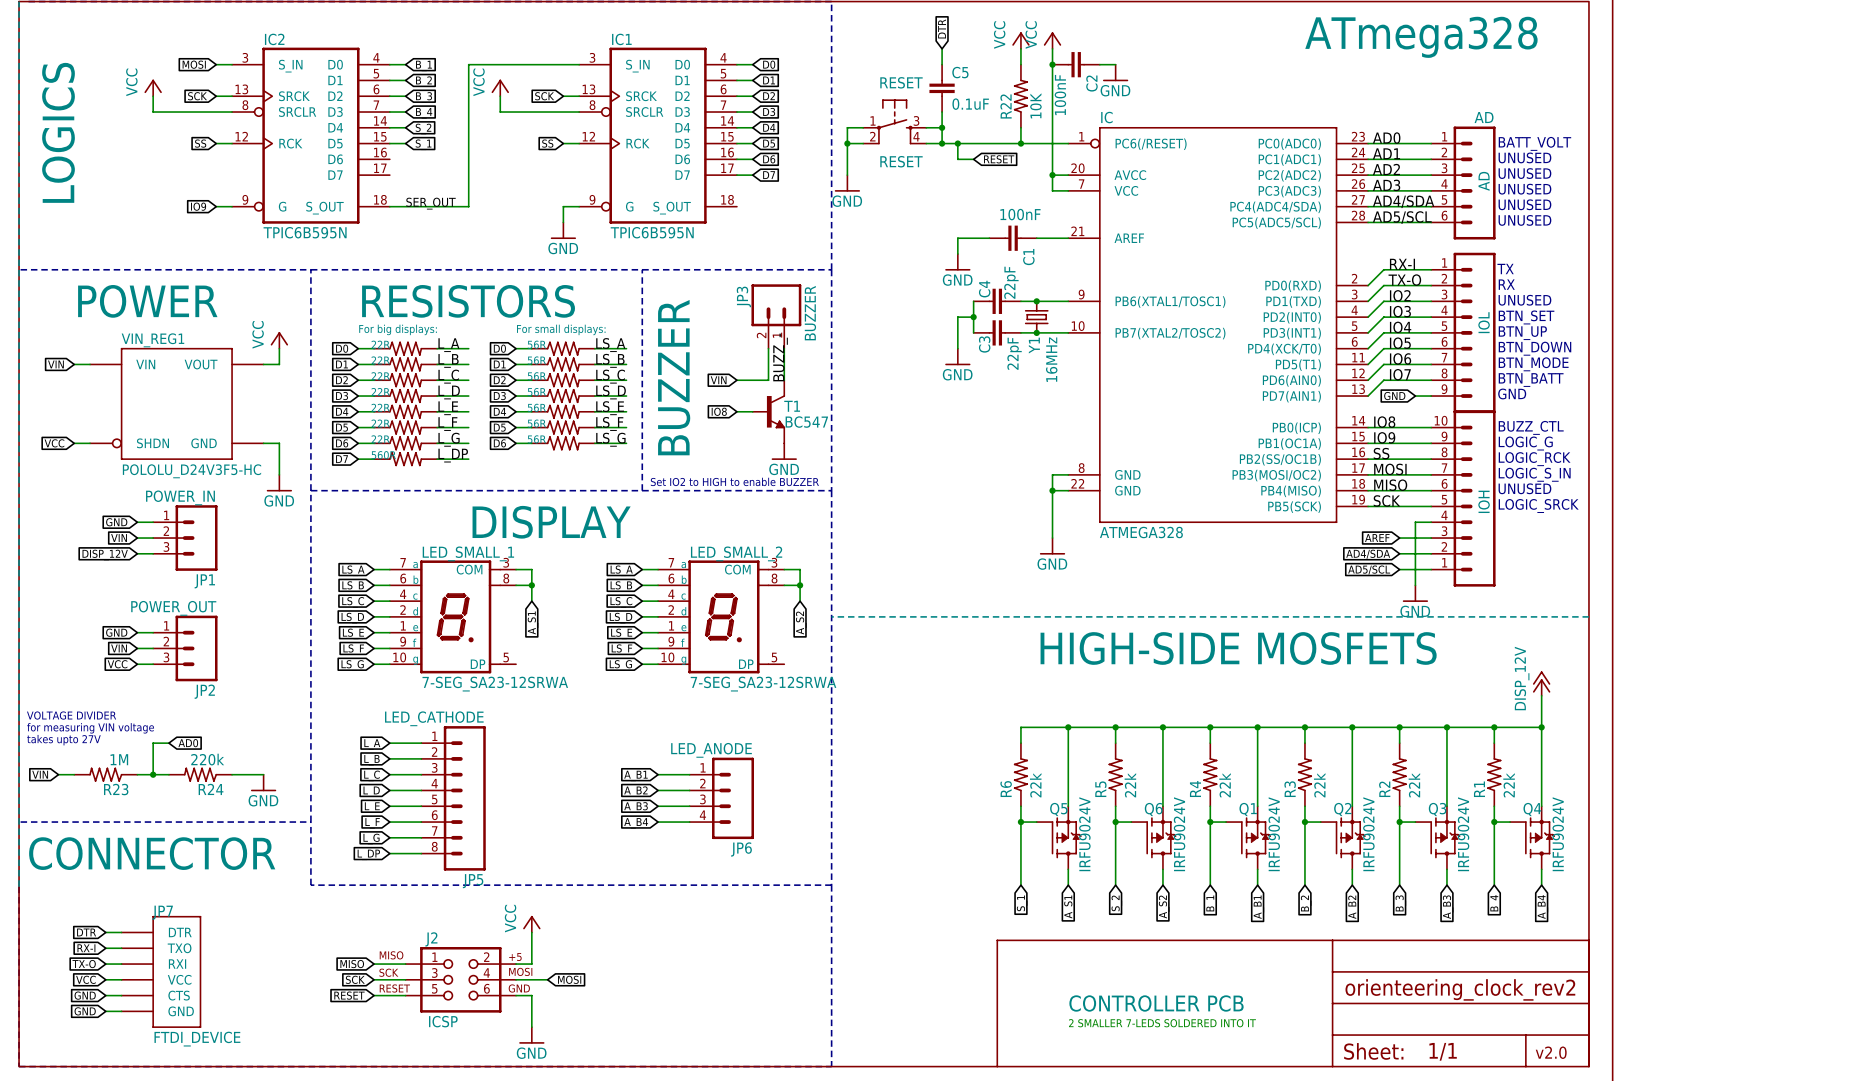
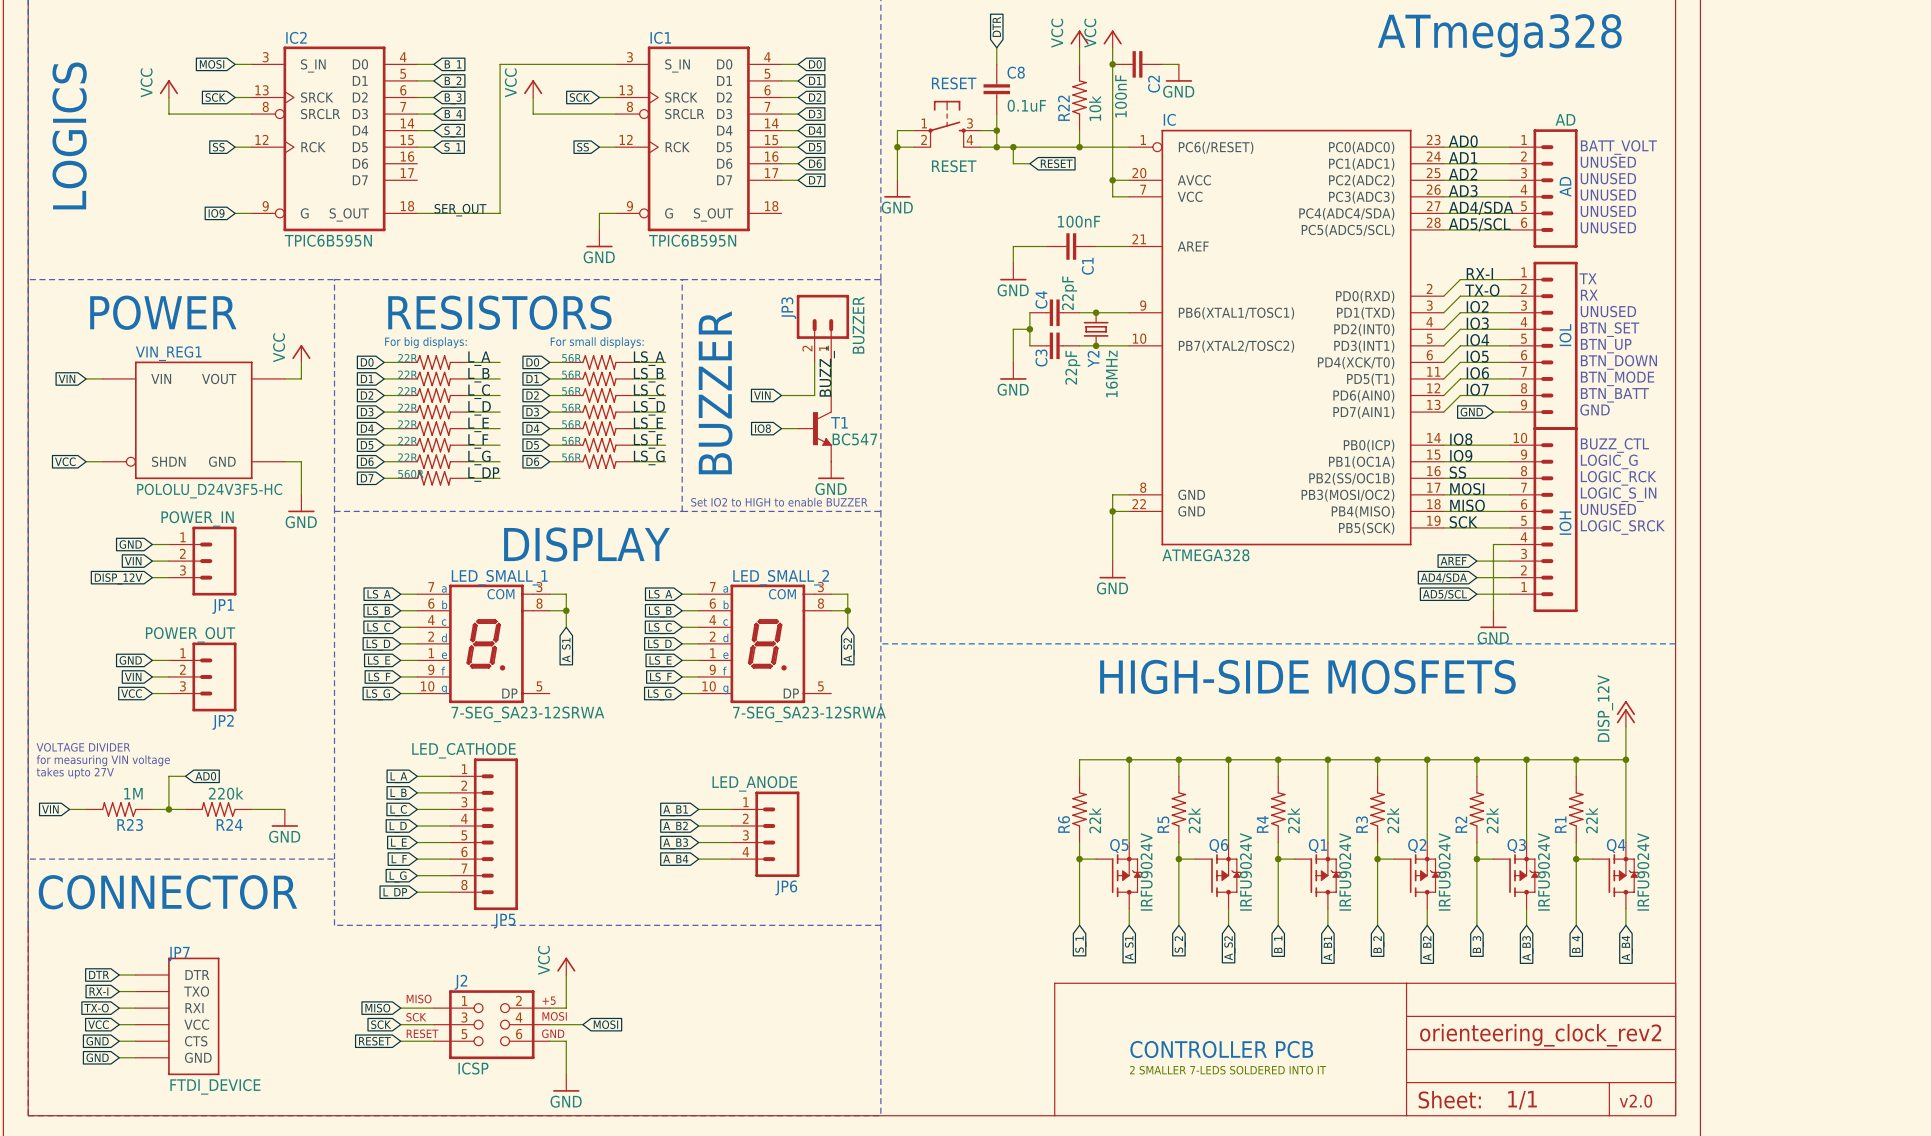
C5 name: C5 (960, 72) -> C8 (1016, 72)
R22 value: 10K (1035, 105) -> 10k (1095, 108)
Y1 name: Y1 (1034, 345) -> Y2 (1093, 359)

